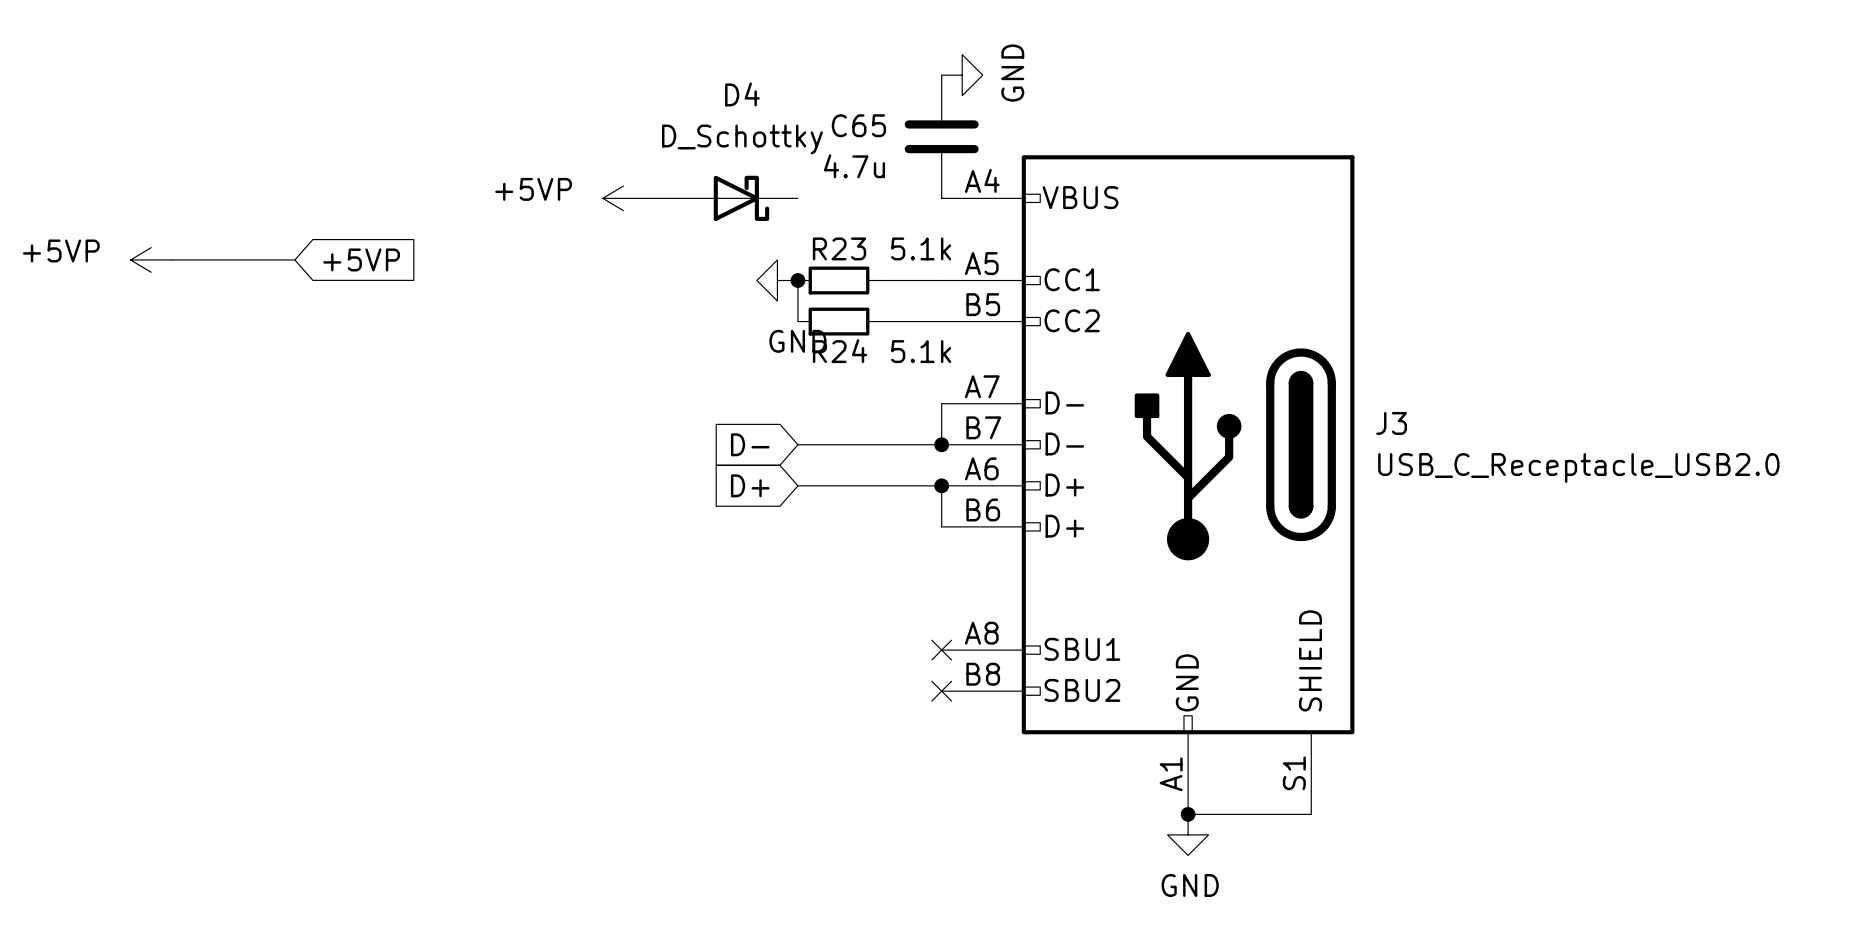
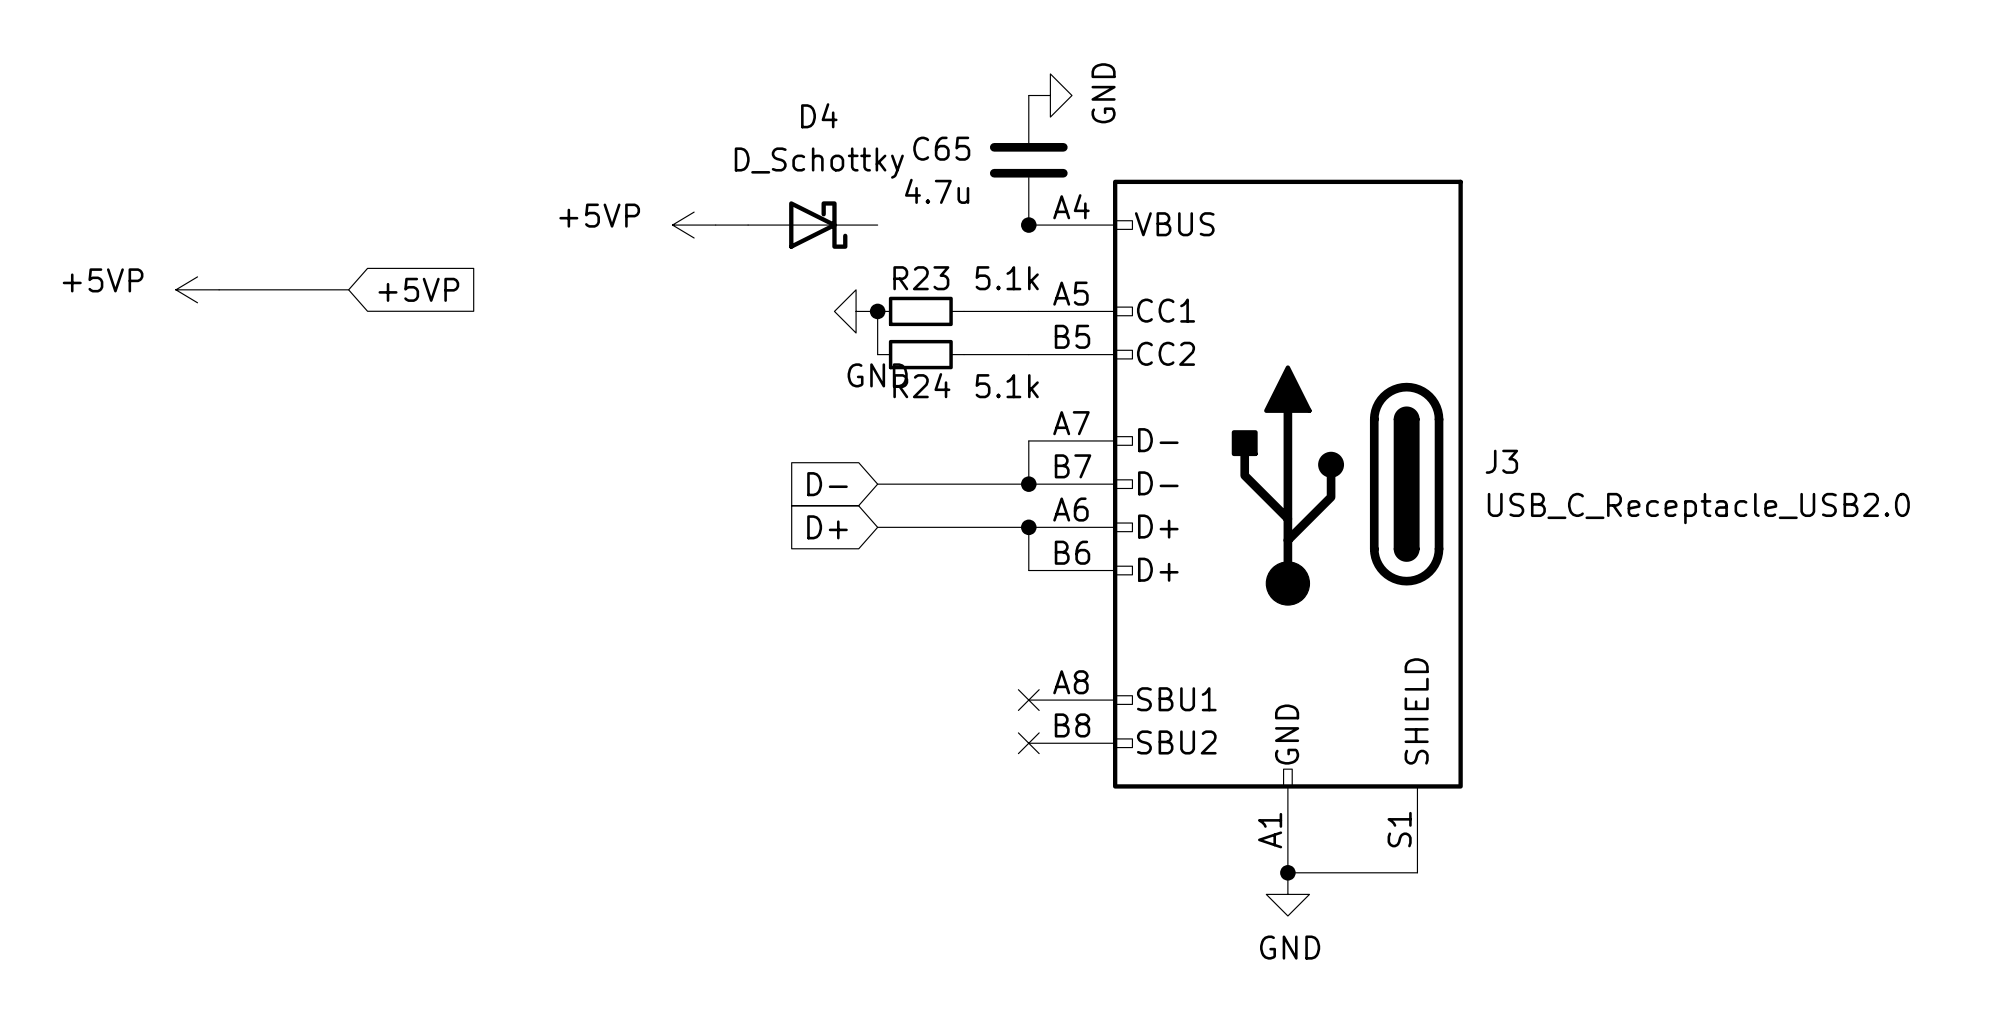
junction: none -> (1028, 225)

